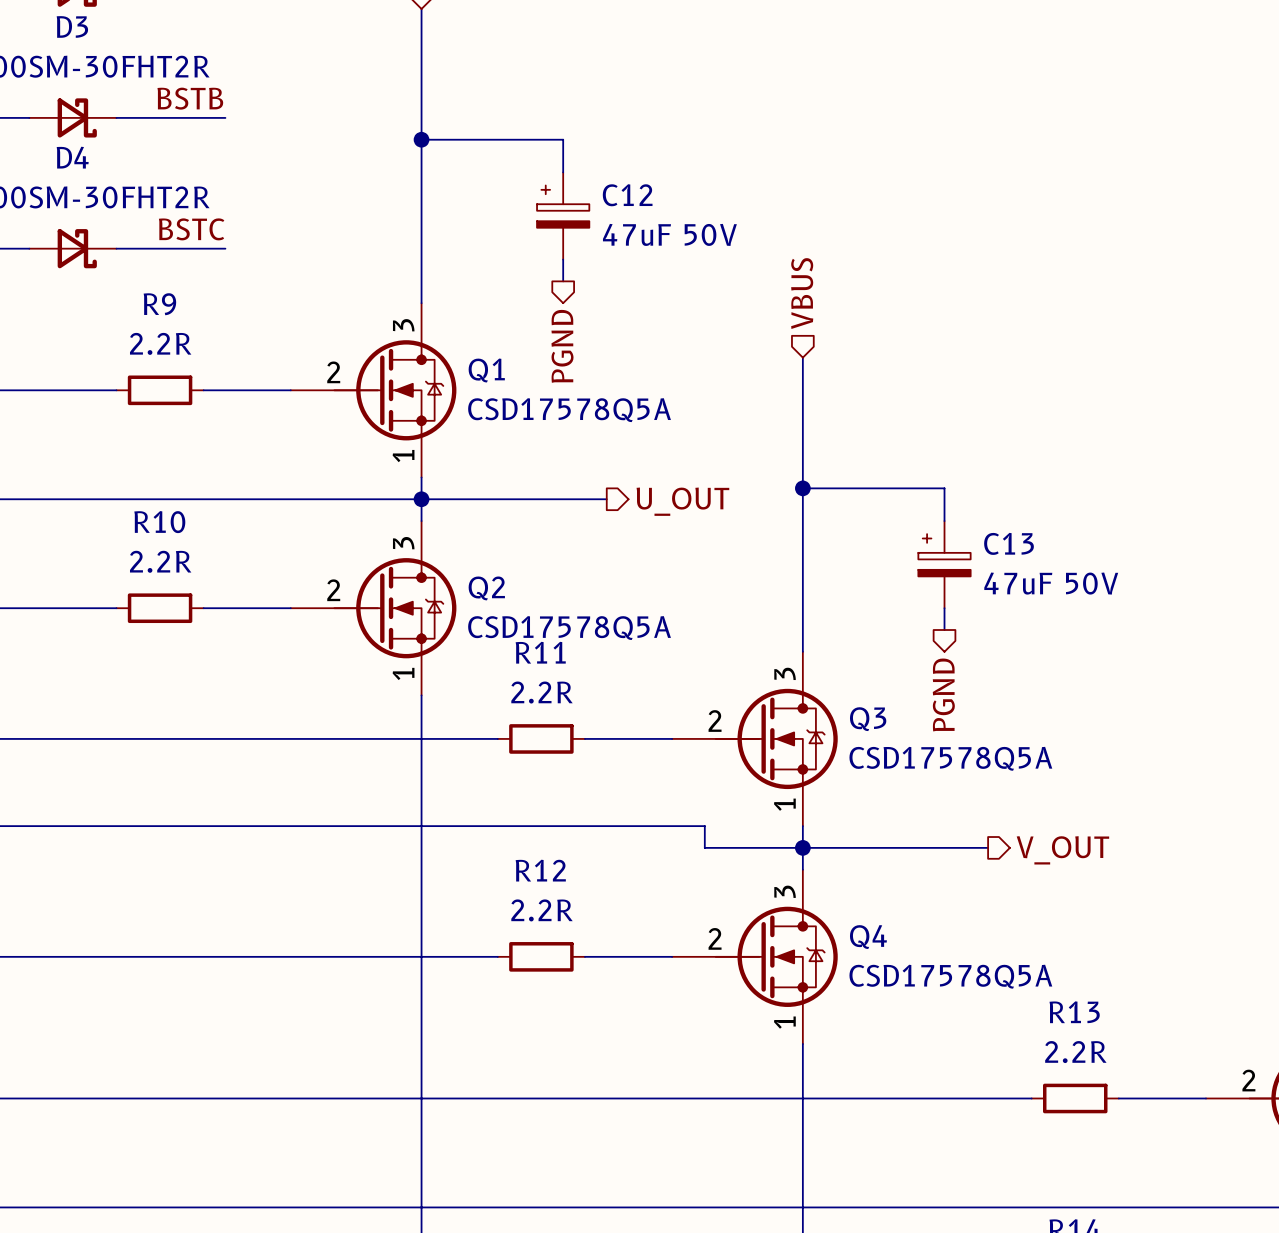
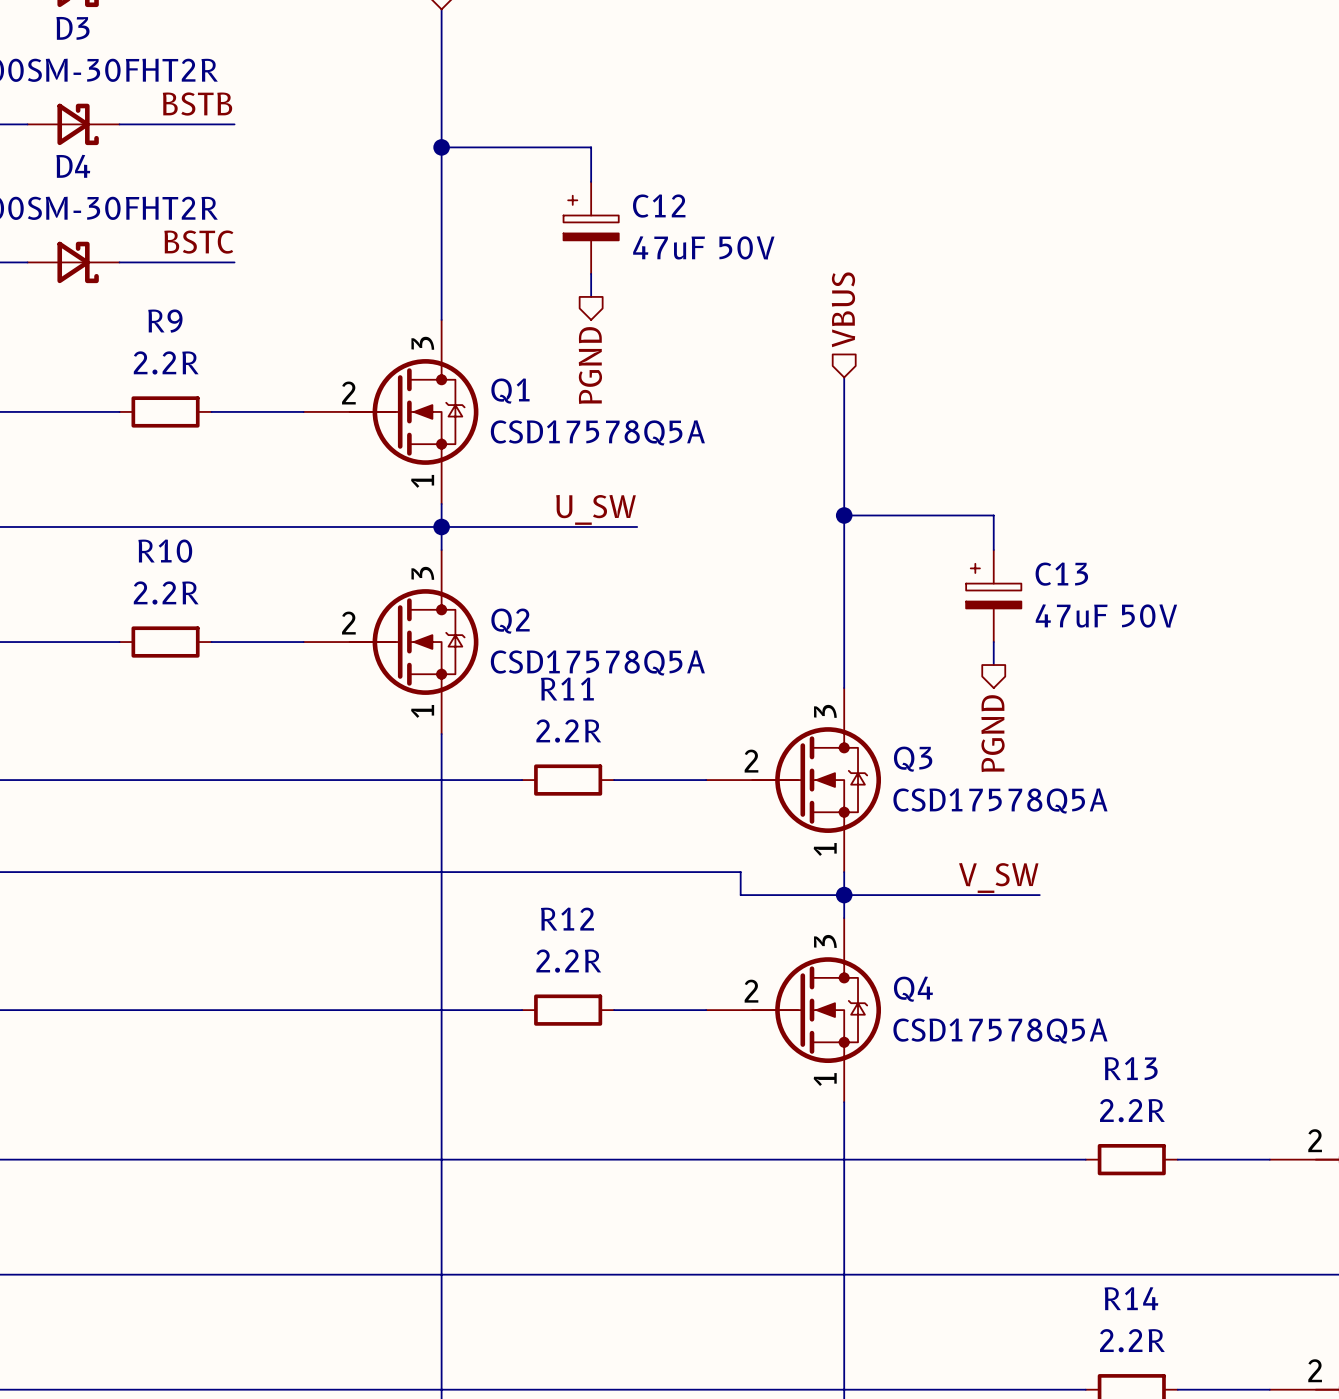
label: none -> U_SW (596, 509)
hierarchical label: U_OUT (682, 501) -> none
label: none -> V_SW (998, 877)
hierarchical label: V_OUT (1062, 850) -> none

